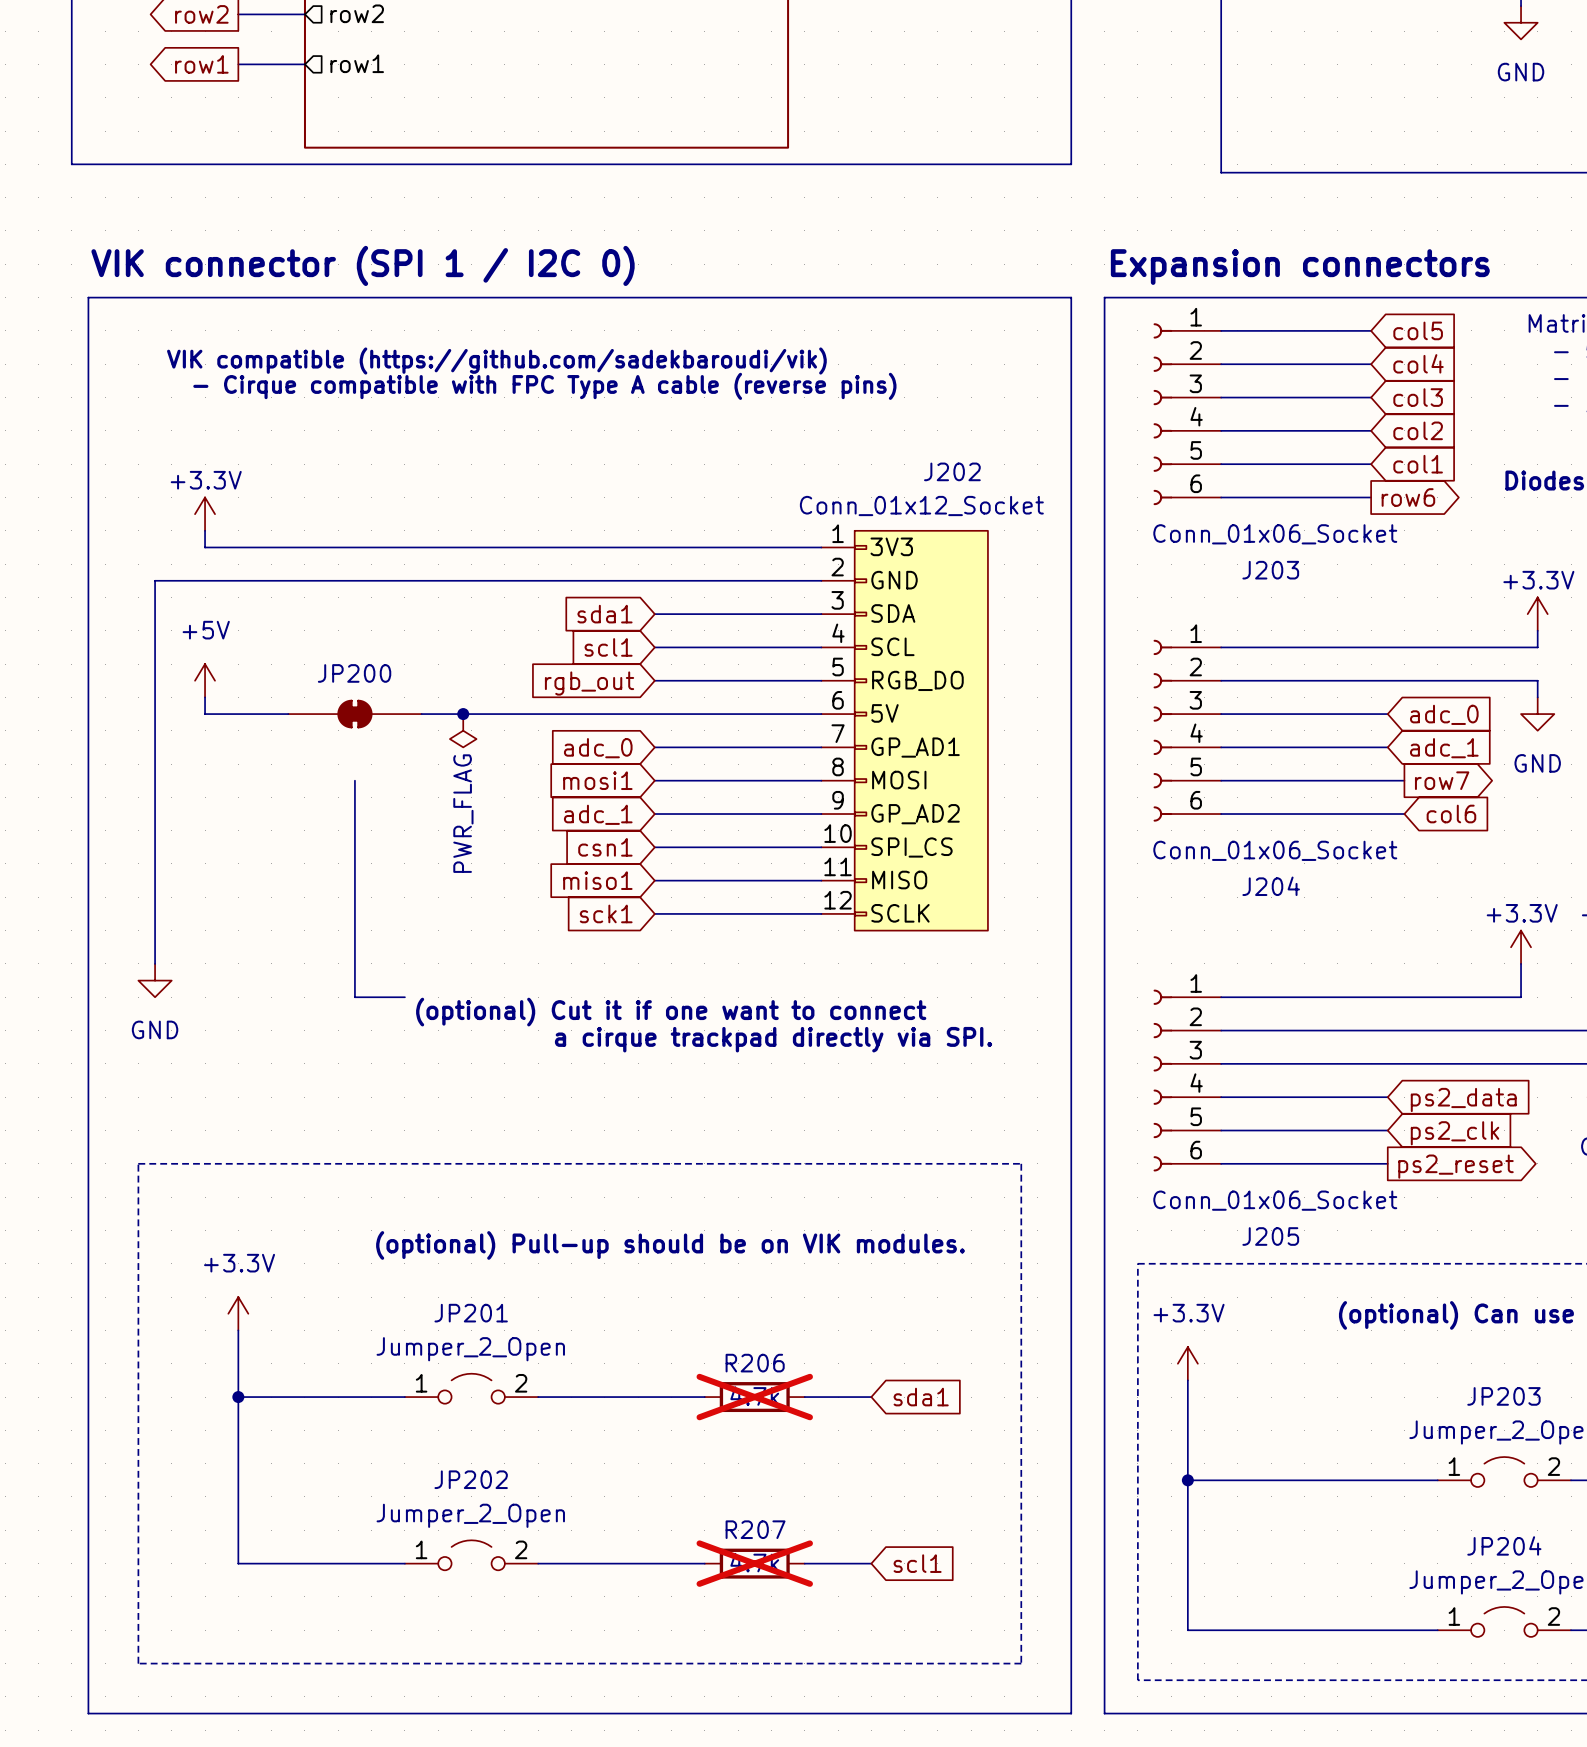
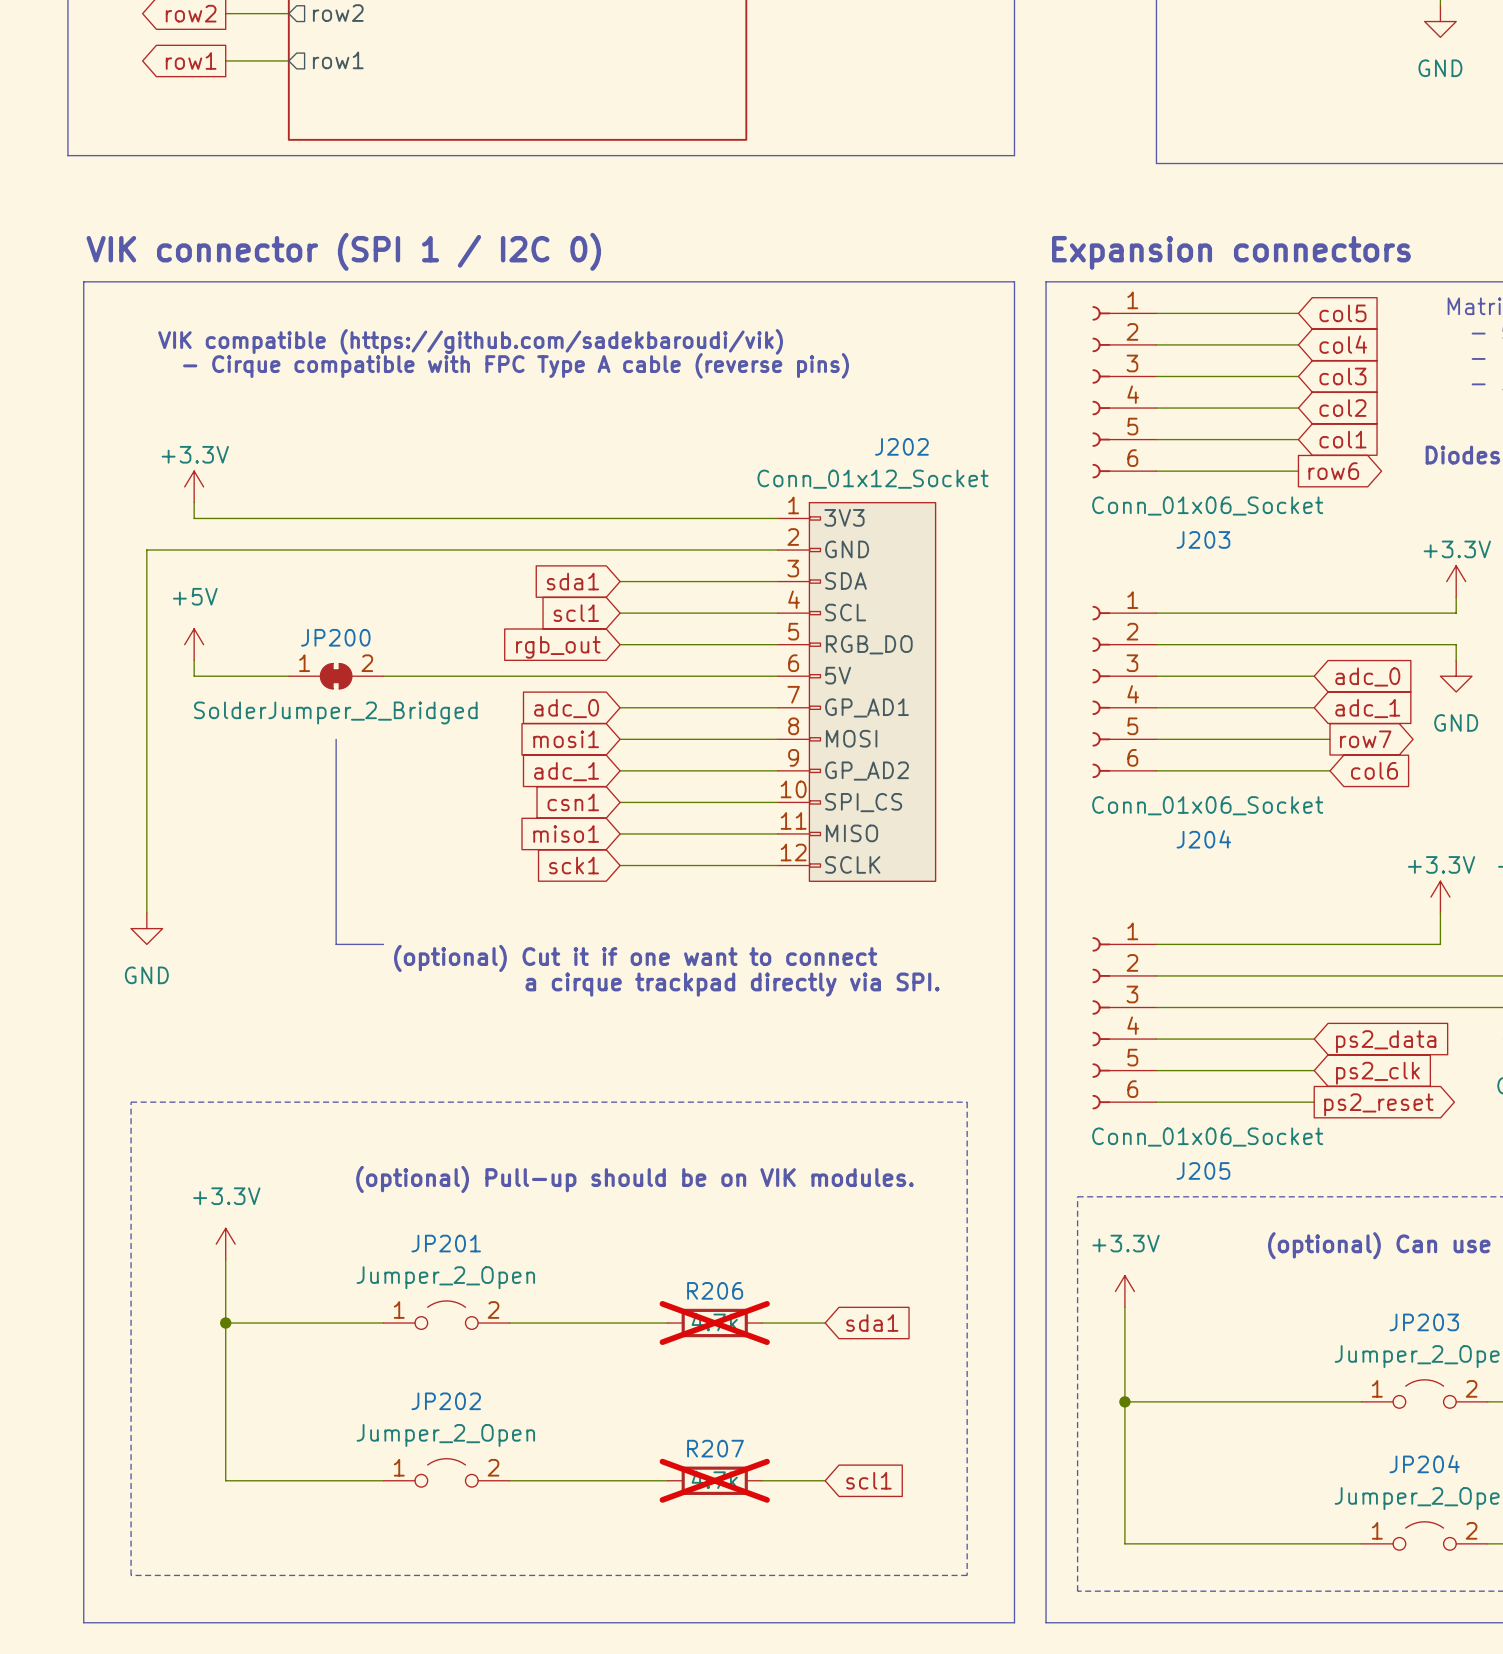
JP200 symbol: [288, 699, 422, 729] -> [288, 663, 384, 689]
junction: (463, 714) -> none
power symbol: PWR_FLAG (463, 730) -> none
JP200 value: none -> SolderJumper_2_Bridged (335, 712)

